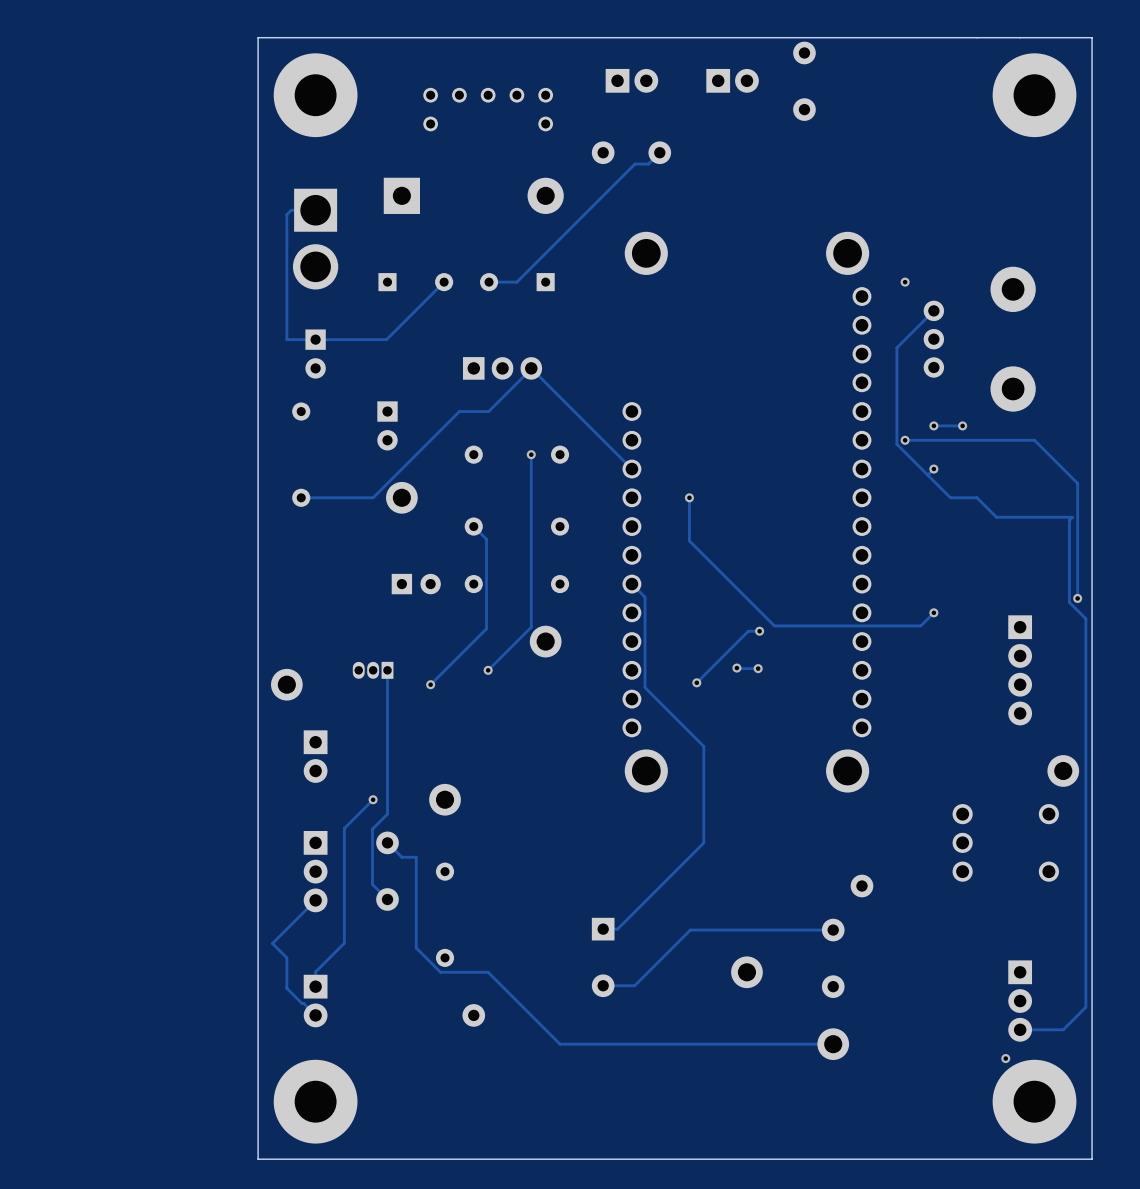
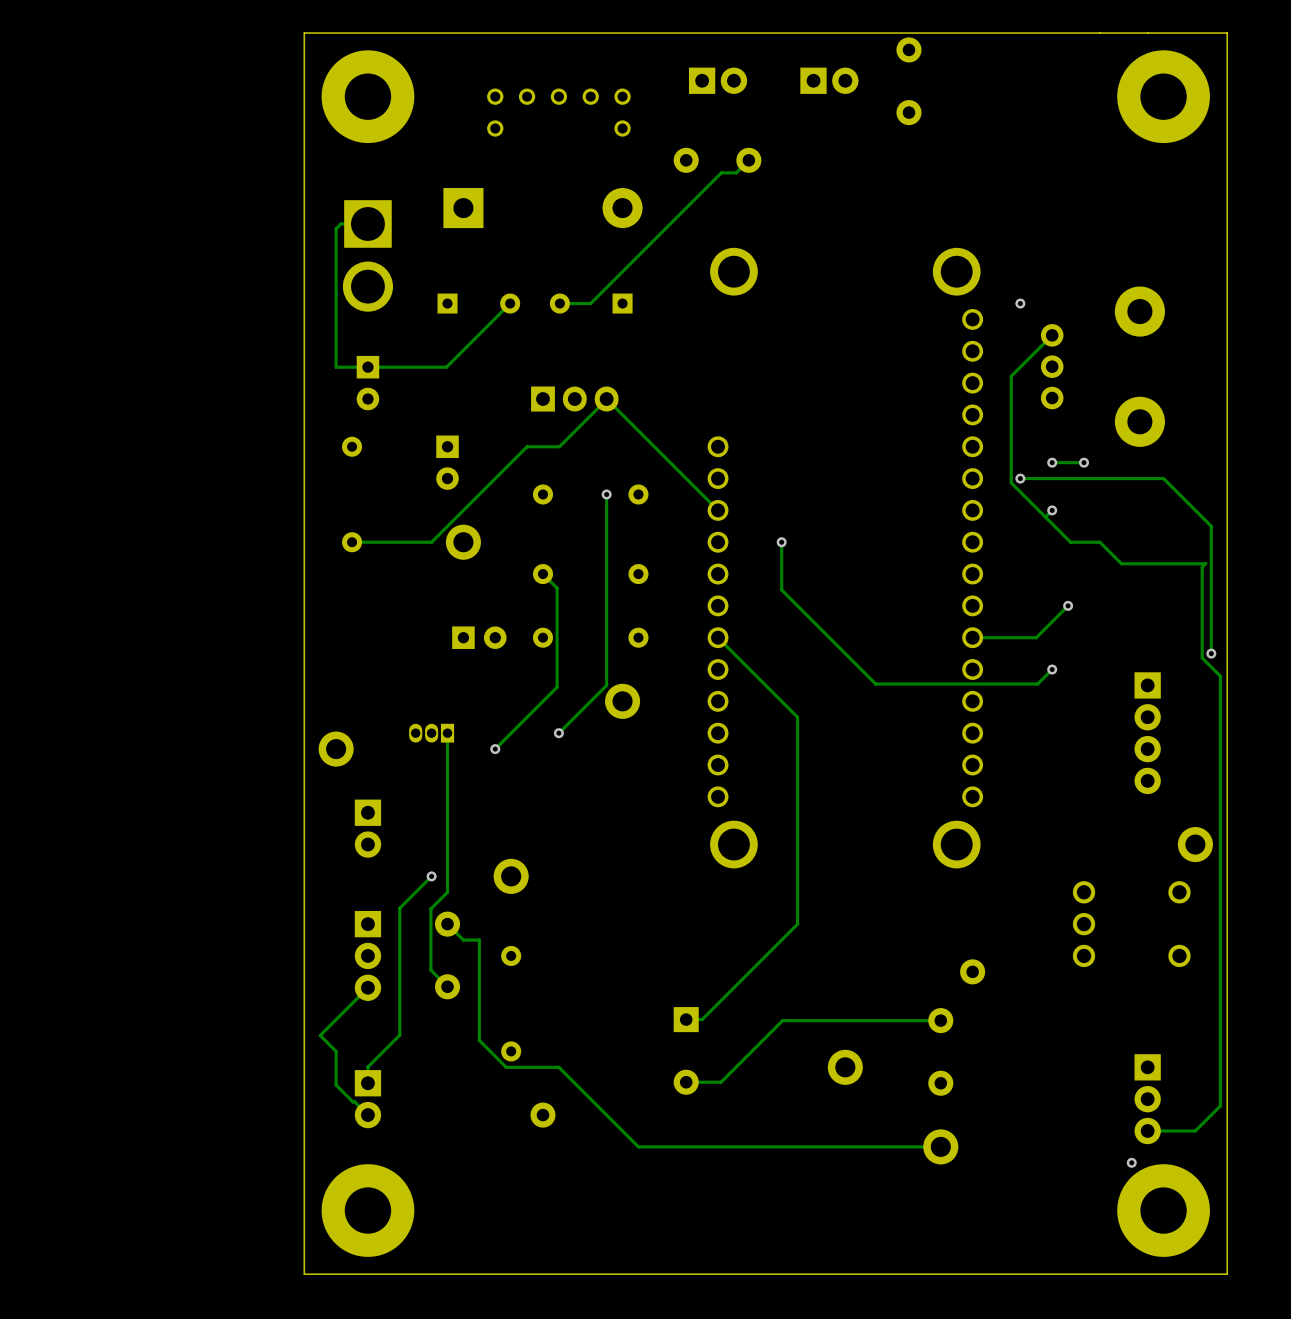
track: none -> (1068, 605) (1036, 637) (972, 637)
via: none -> (1068, 605)
track: (645, 597) (645, 687) (703, 746) -> (732, 652) (797, 717) (797, 817)
track: (759, 631) (748, 631) (696, 682) -> none
via: (759, 631) -> none
track: (736, 668) (758, 668) -> none
via: (736, 668) -> none
via: (758, 668) -> none
via: (696, 682) -> none

